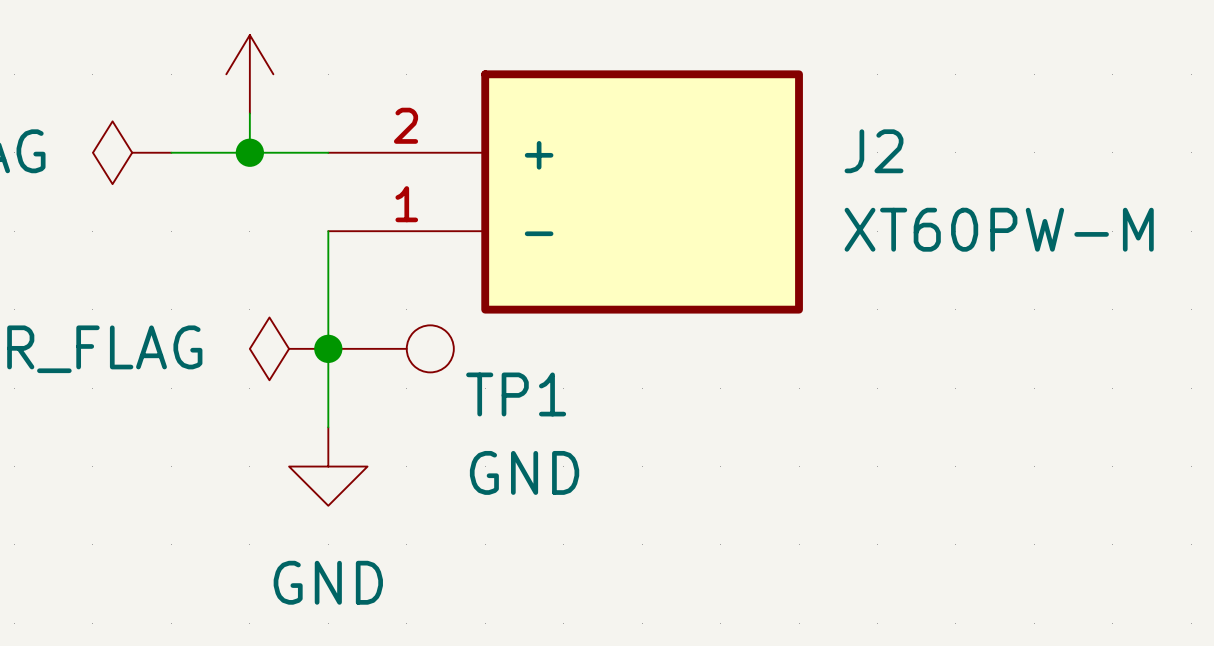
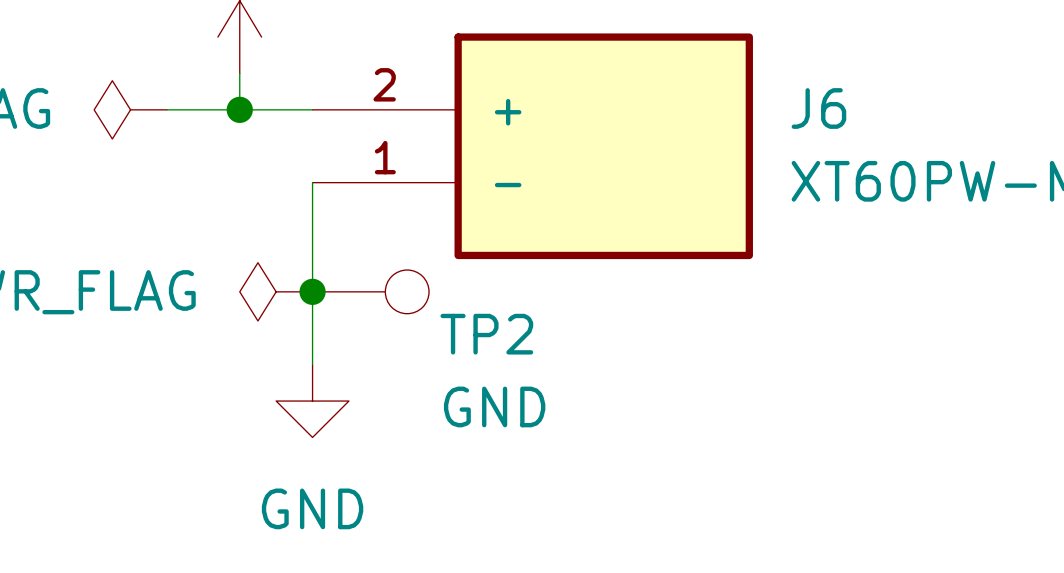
J2 name: J2 (874, 151) -> J6 (818, 108)
TP1 name: TP1 (516, 394) -> TP2 (486, 334)

